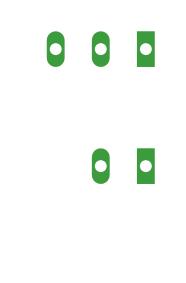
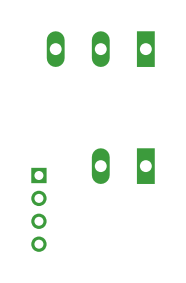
part: none -> (38, 209)

